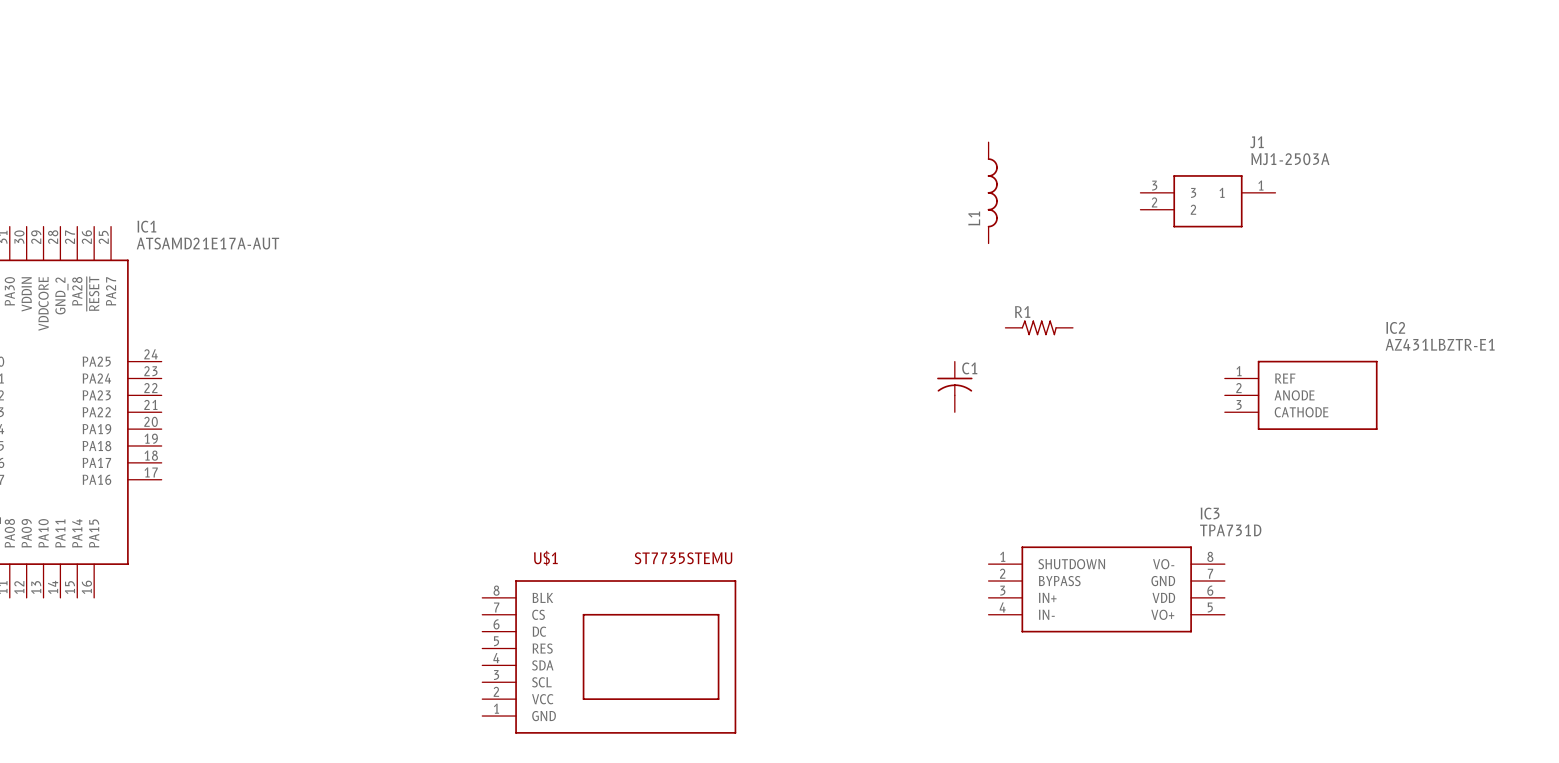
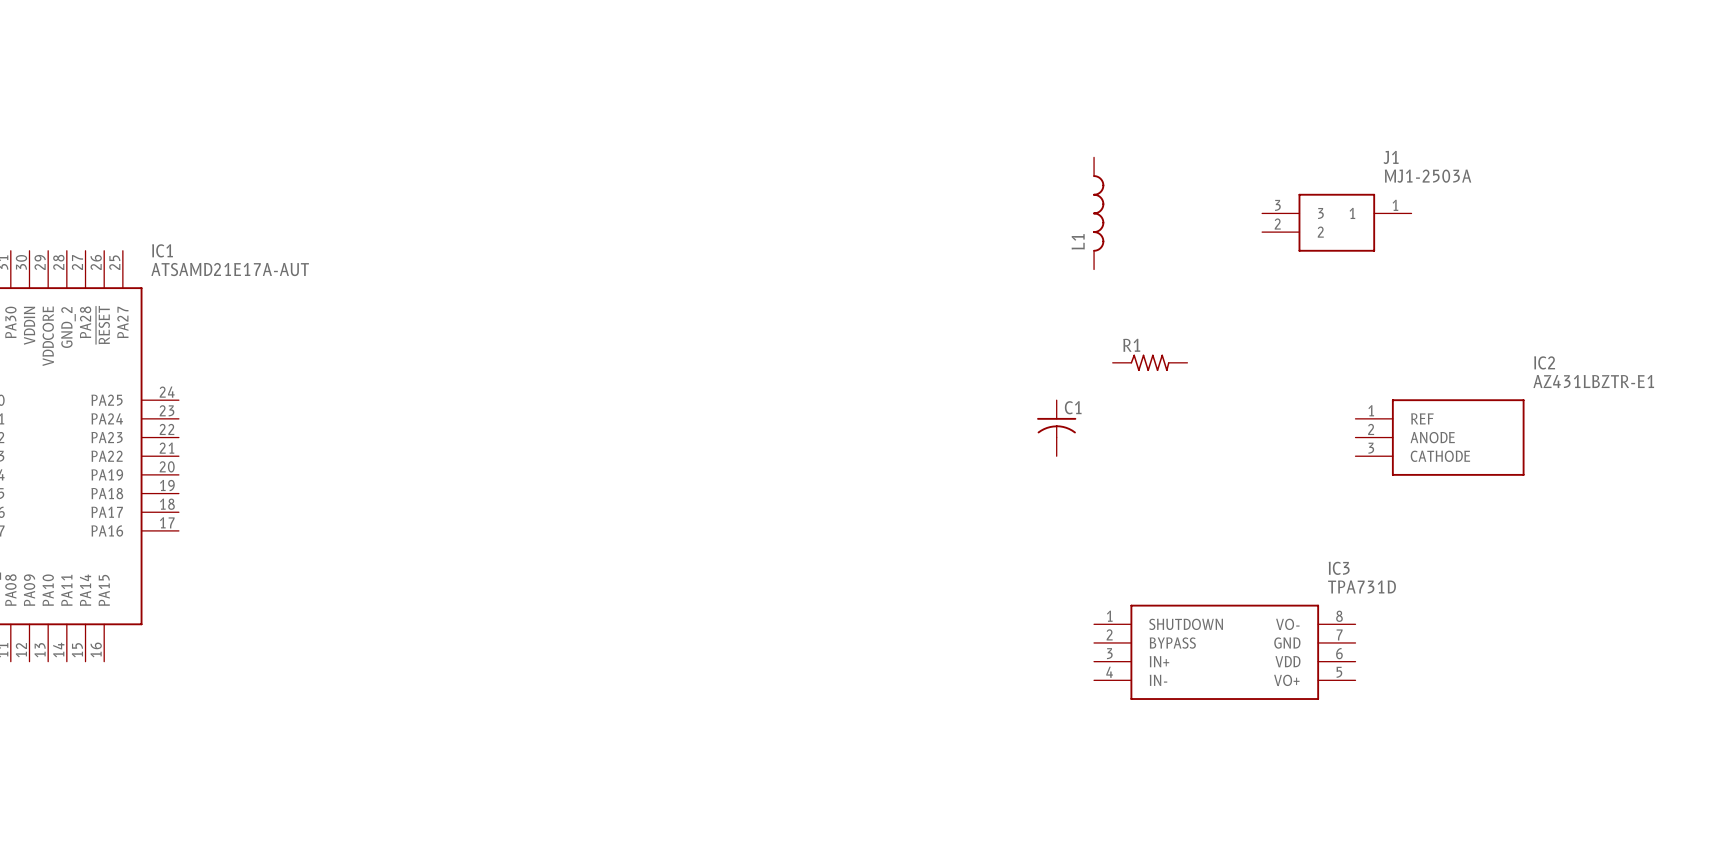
U$1: ST7735STEMU (609, 656) -> none

